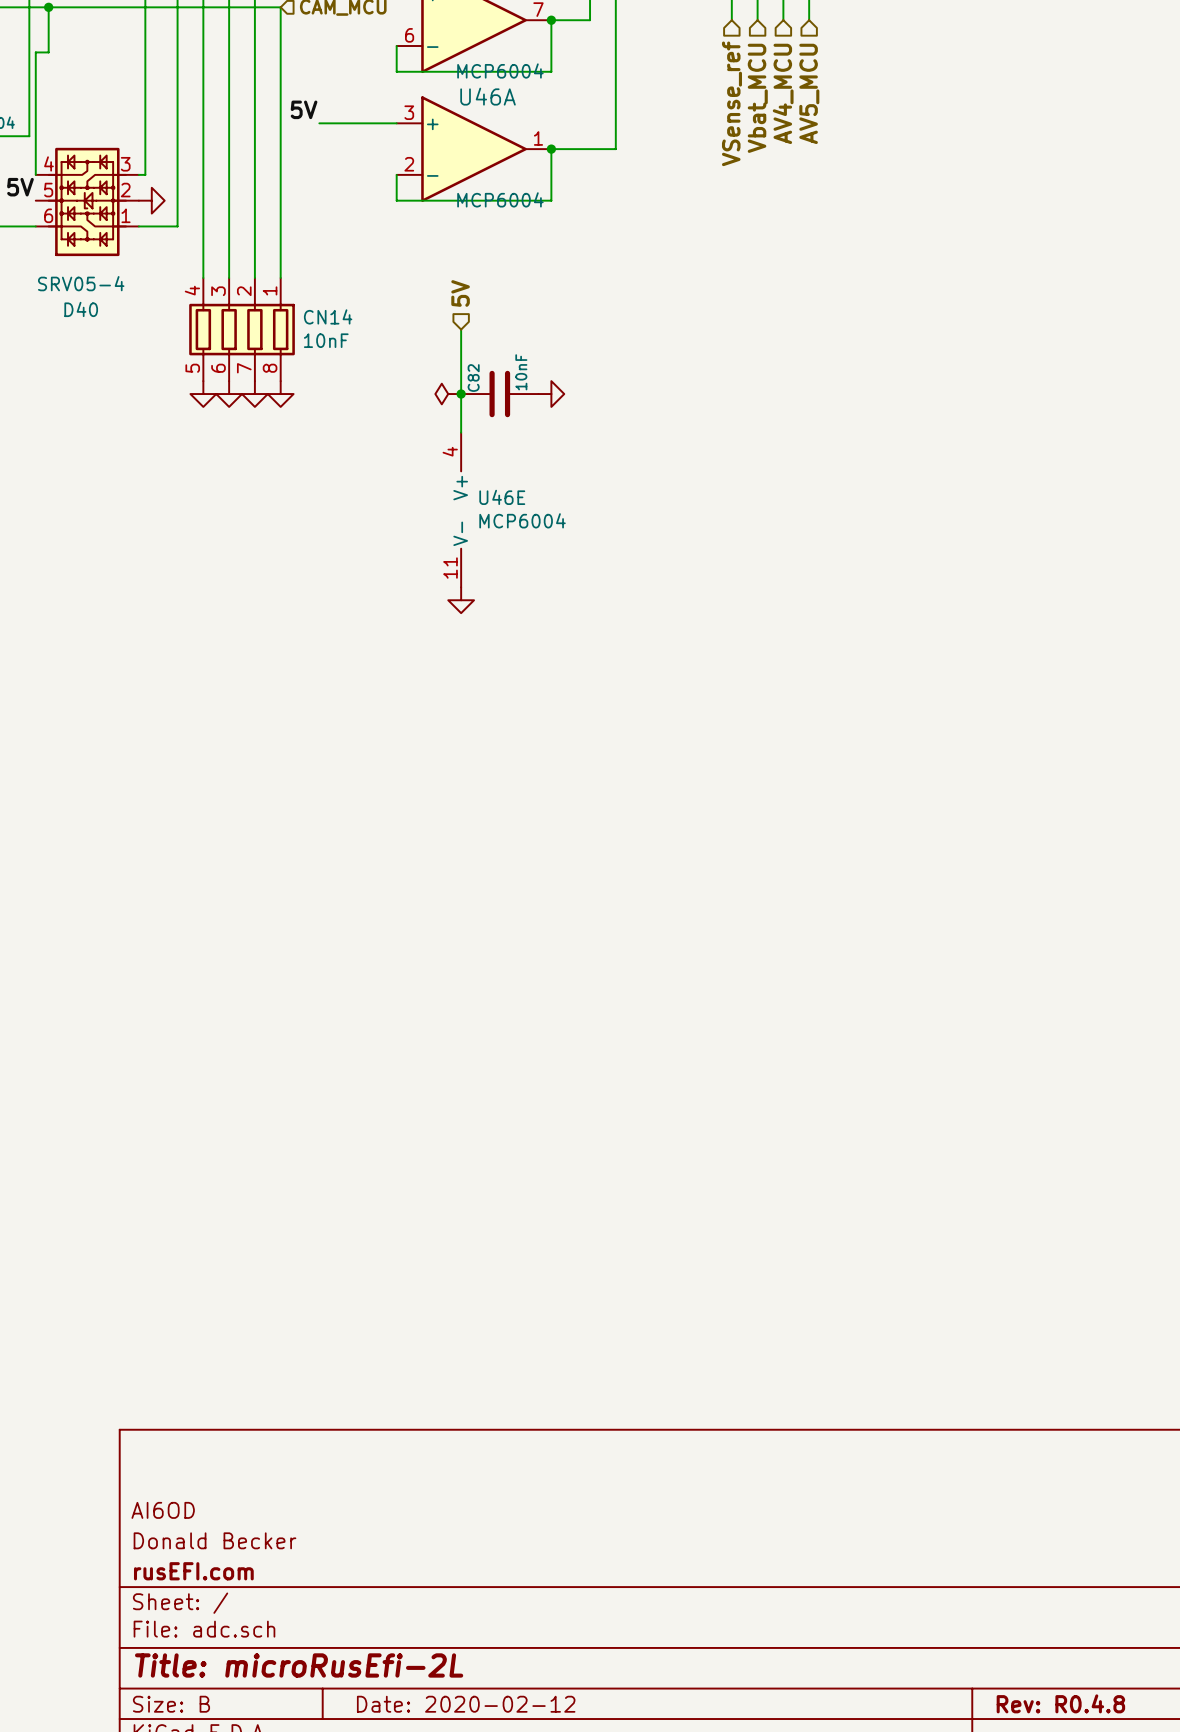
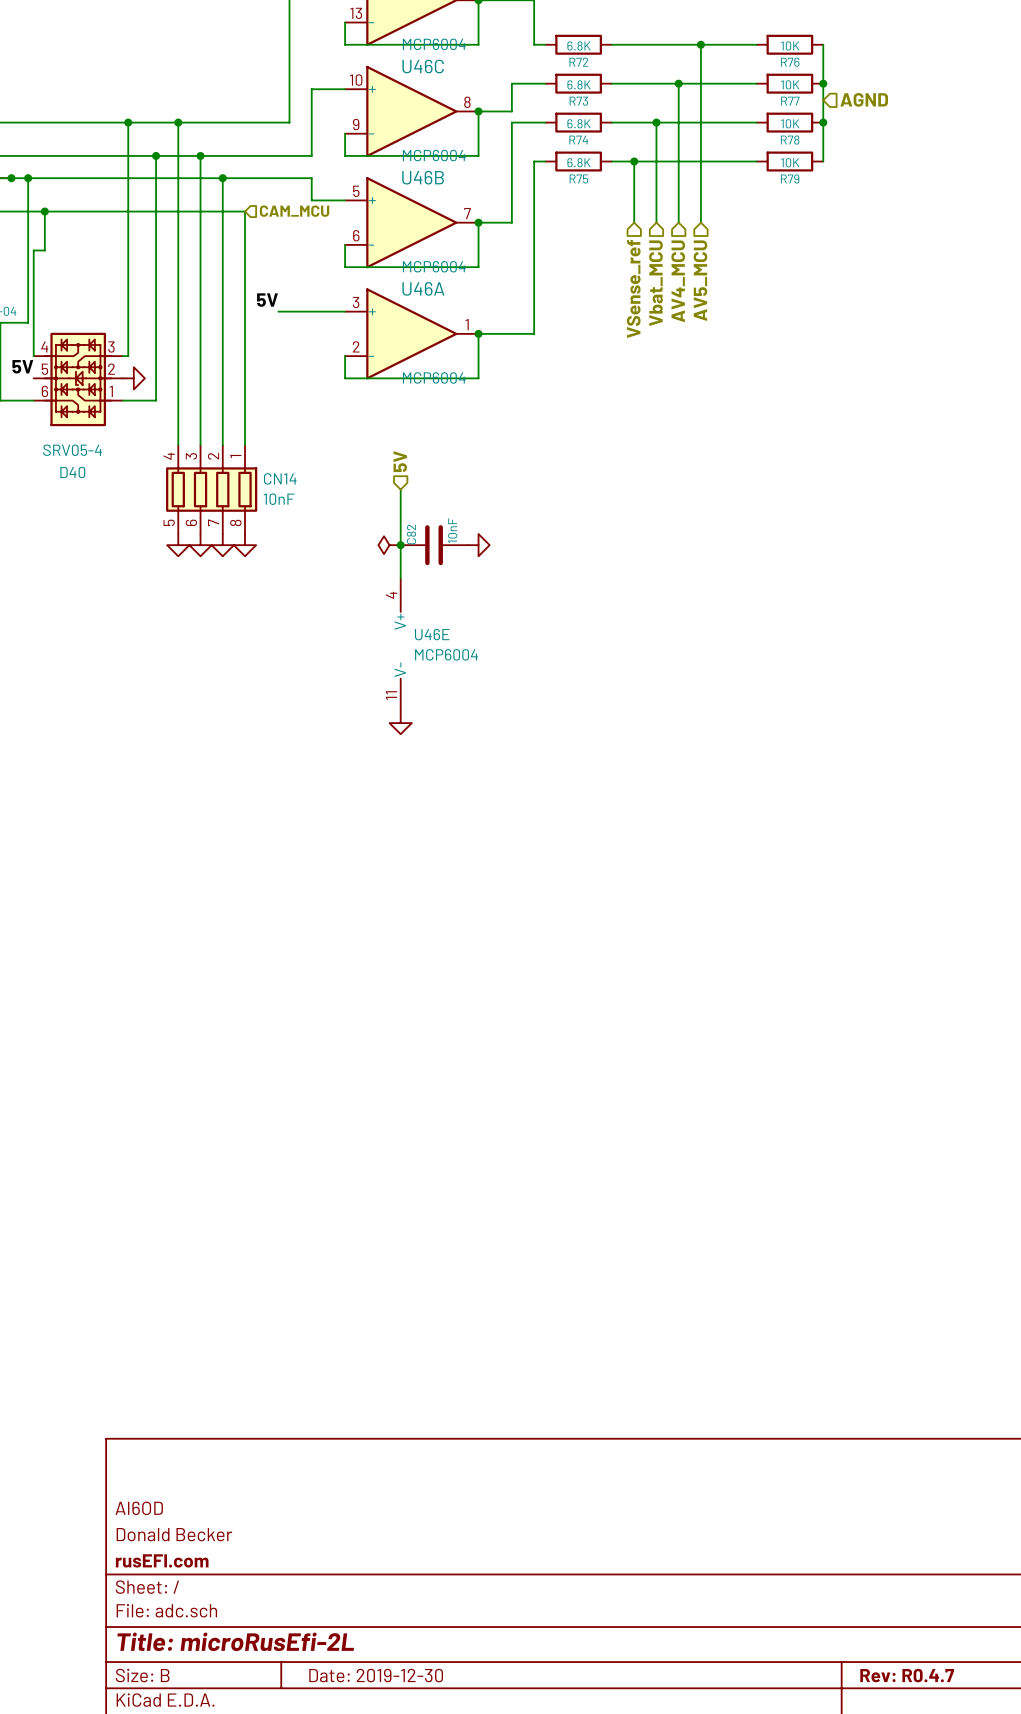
title block: Rev: R0.4.8 (1060, 1703) -> Rev: R0.4.7 (907, 1675)
title block: Date: 2020-02-12 (466, 1704) -> Date: 2019-12-30 (376, 1675)

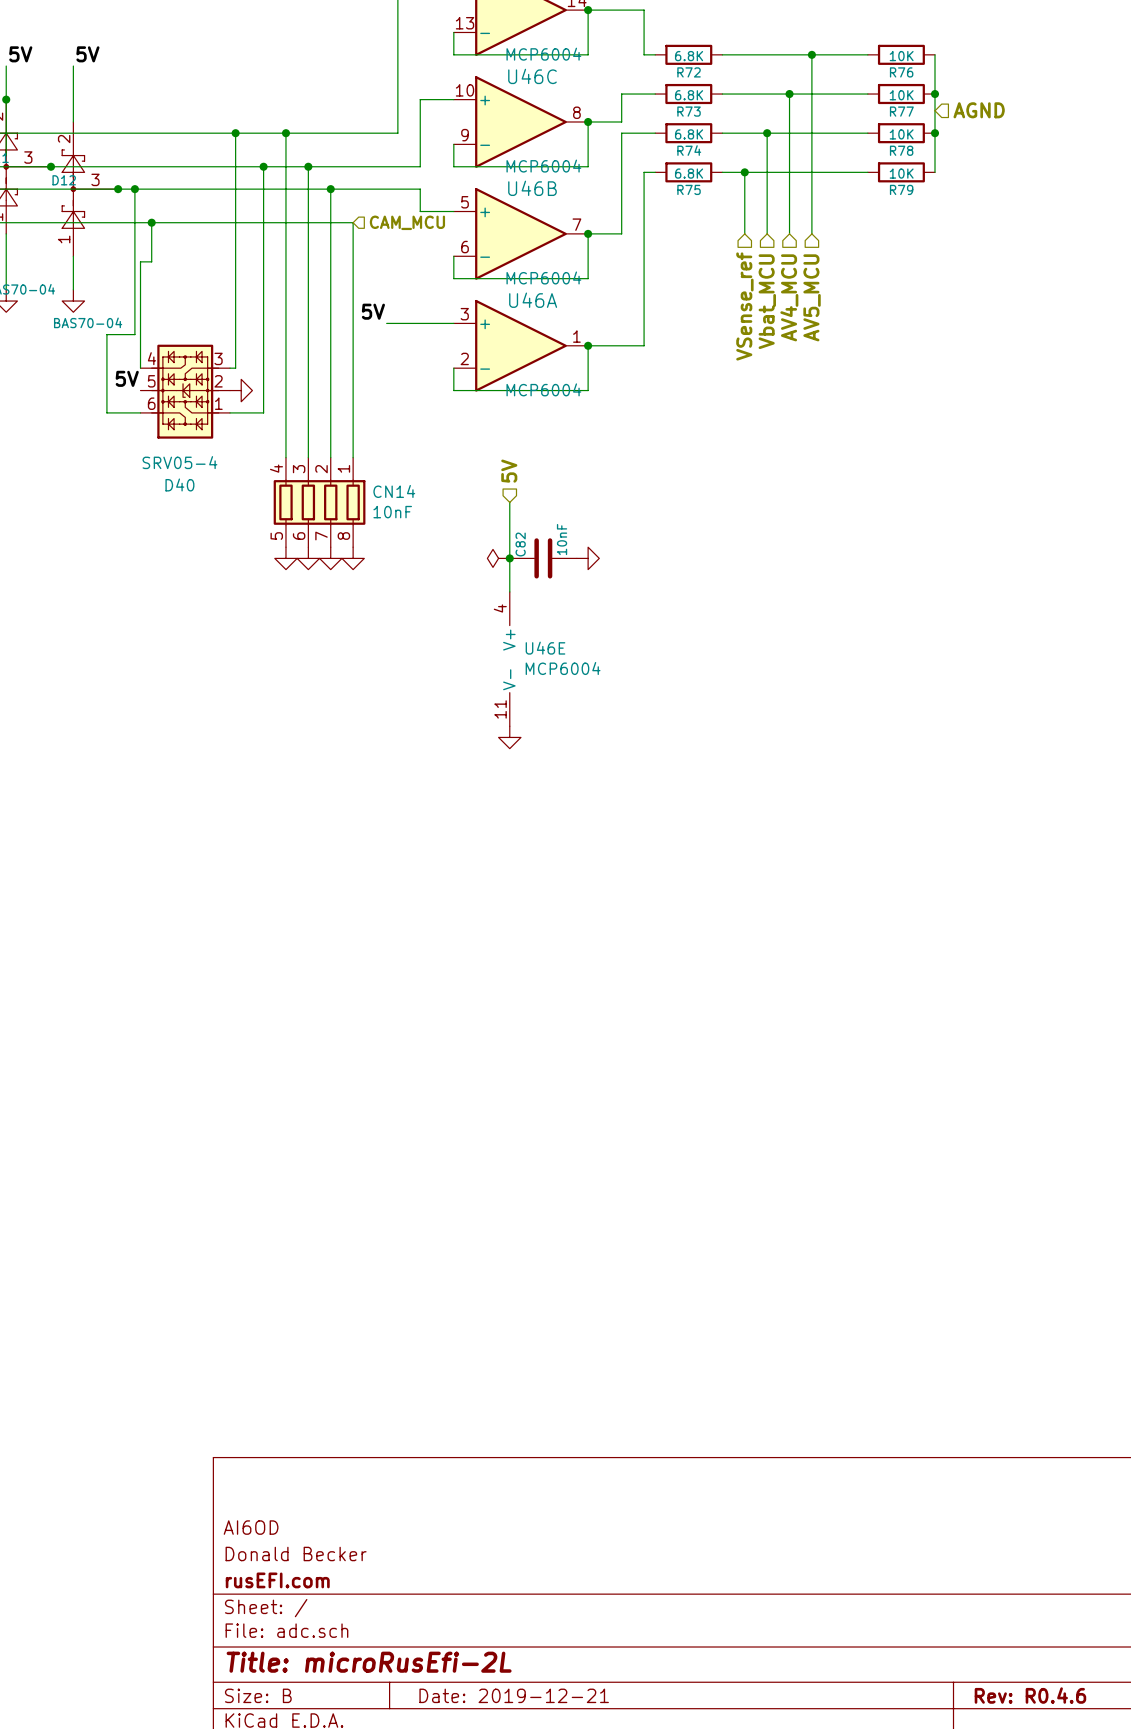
title block: Date: 2019-12-30 (376, 1675) -> Date: 2019-12-21 (514, 1695)
title block: Rev: R0.4.7 (907, 1675) -> Rev: R0.4.6 (1030, 1695)

